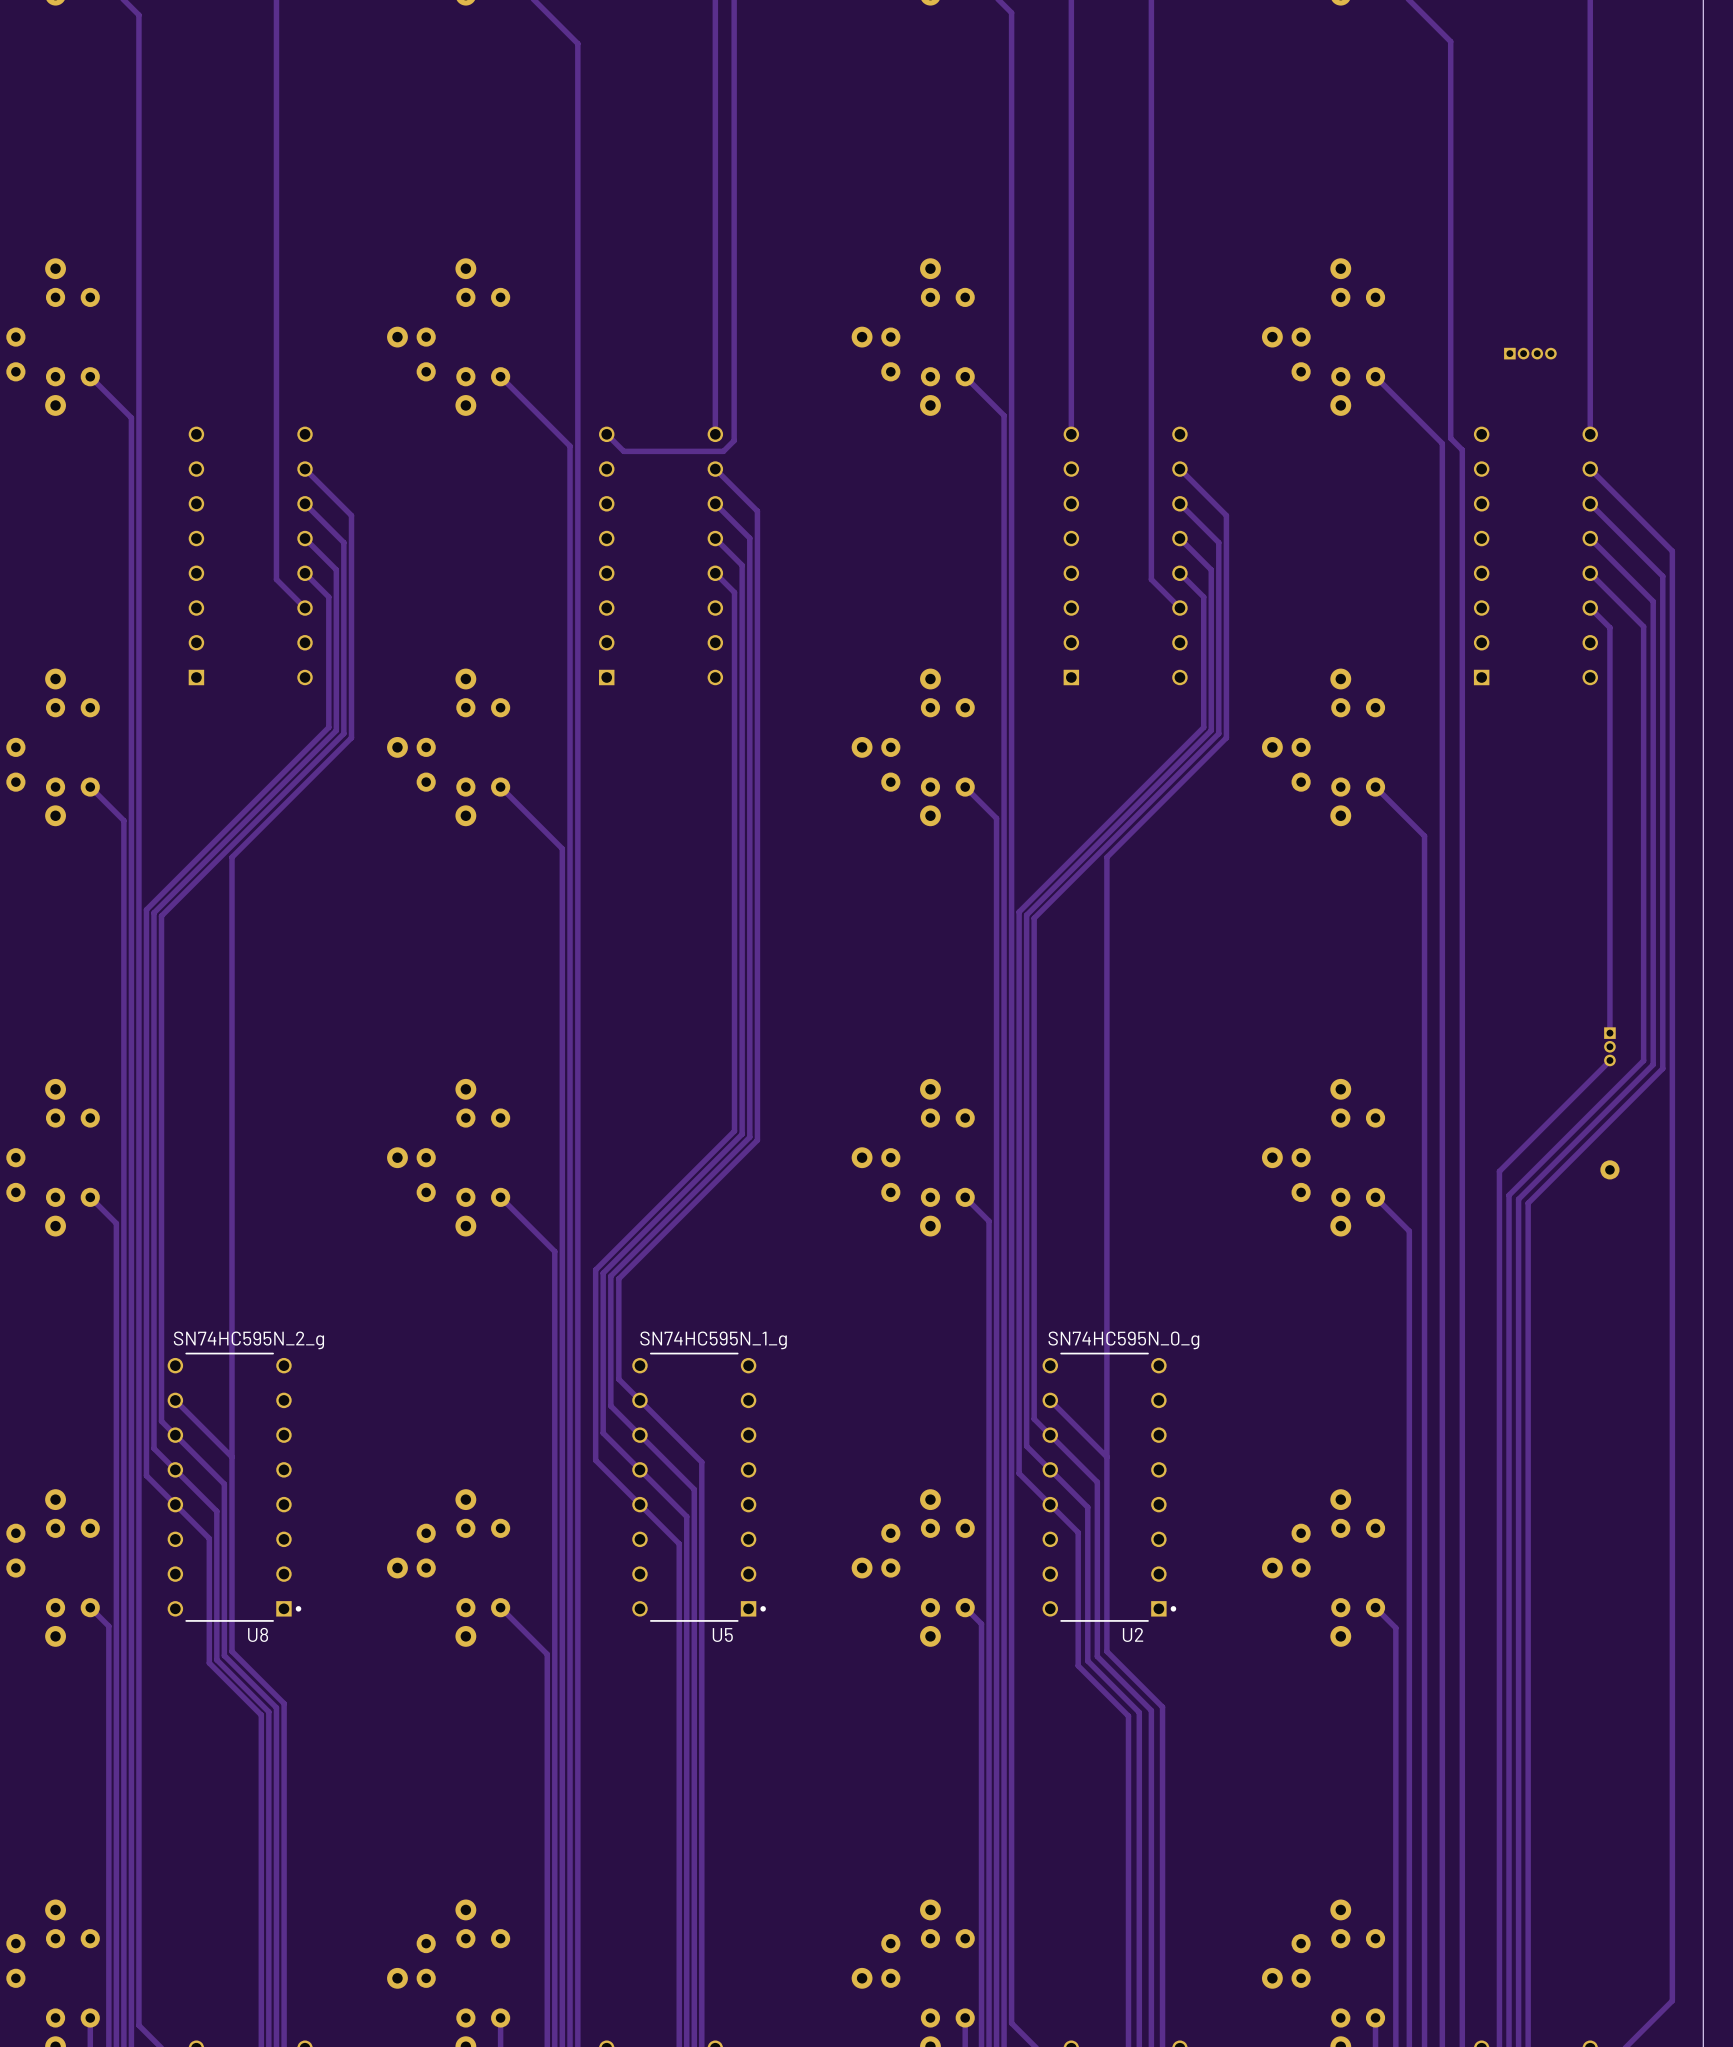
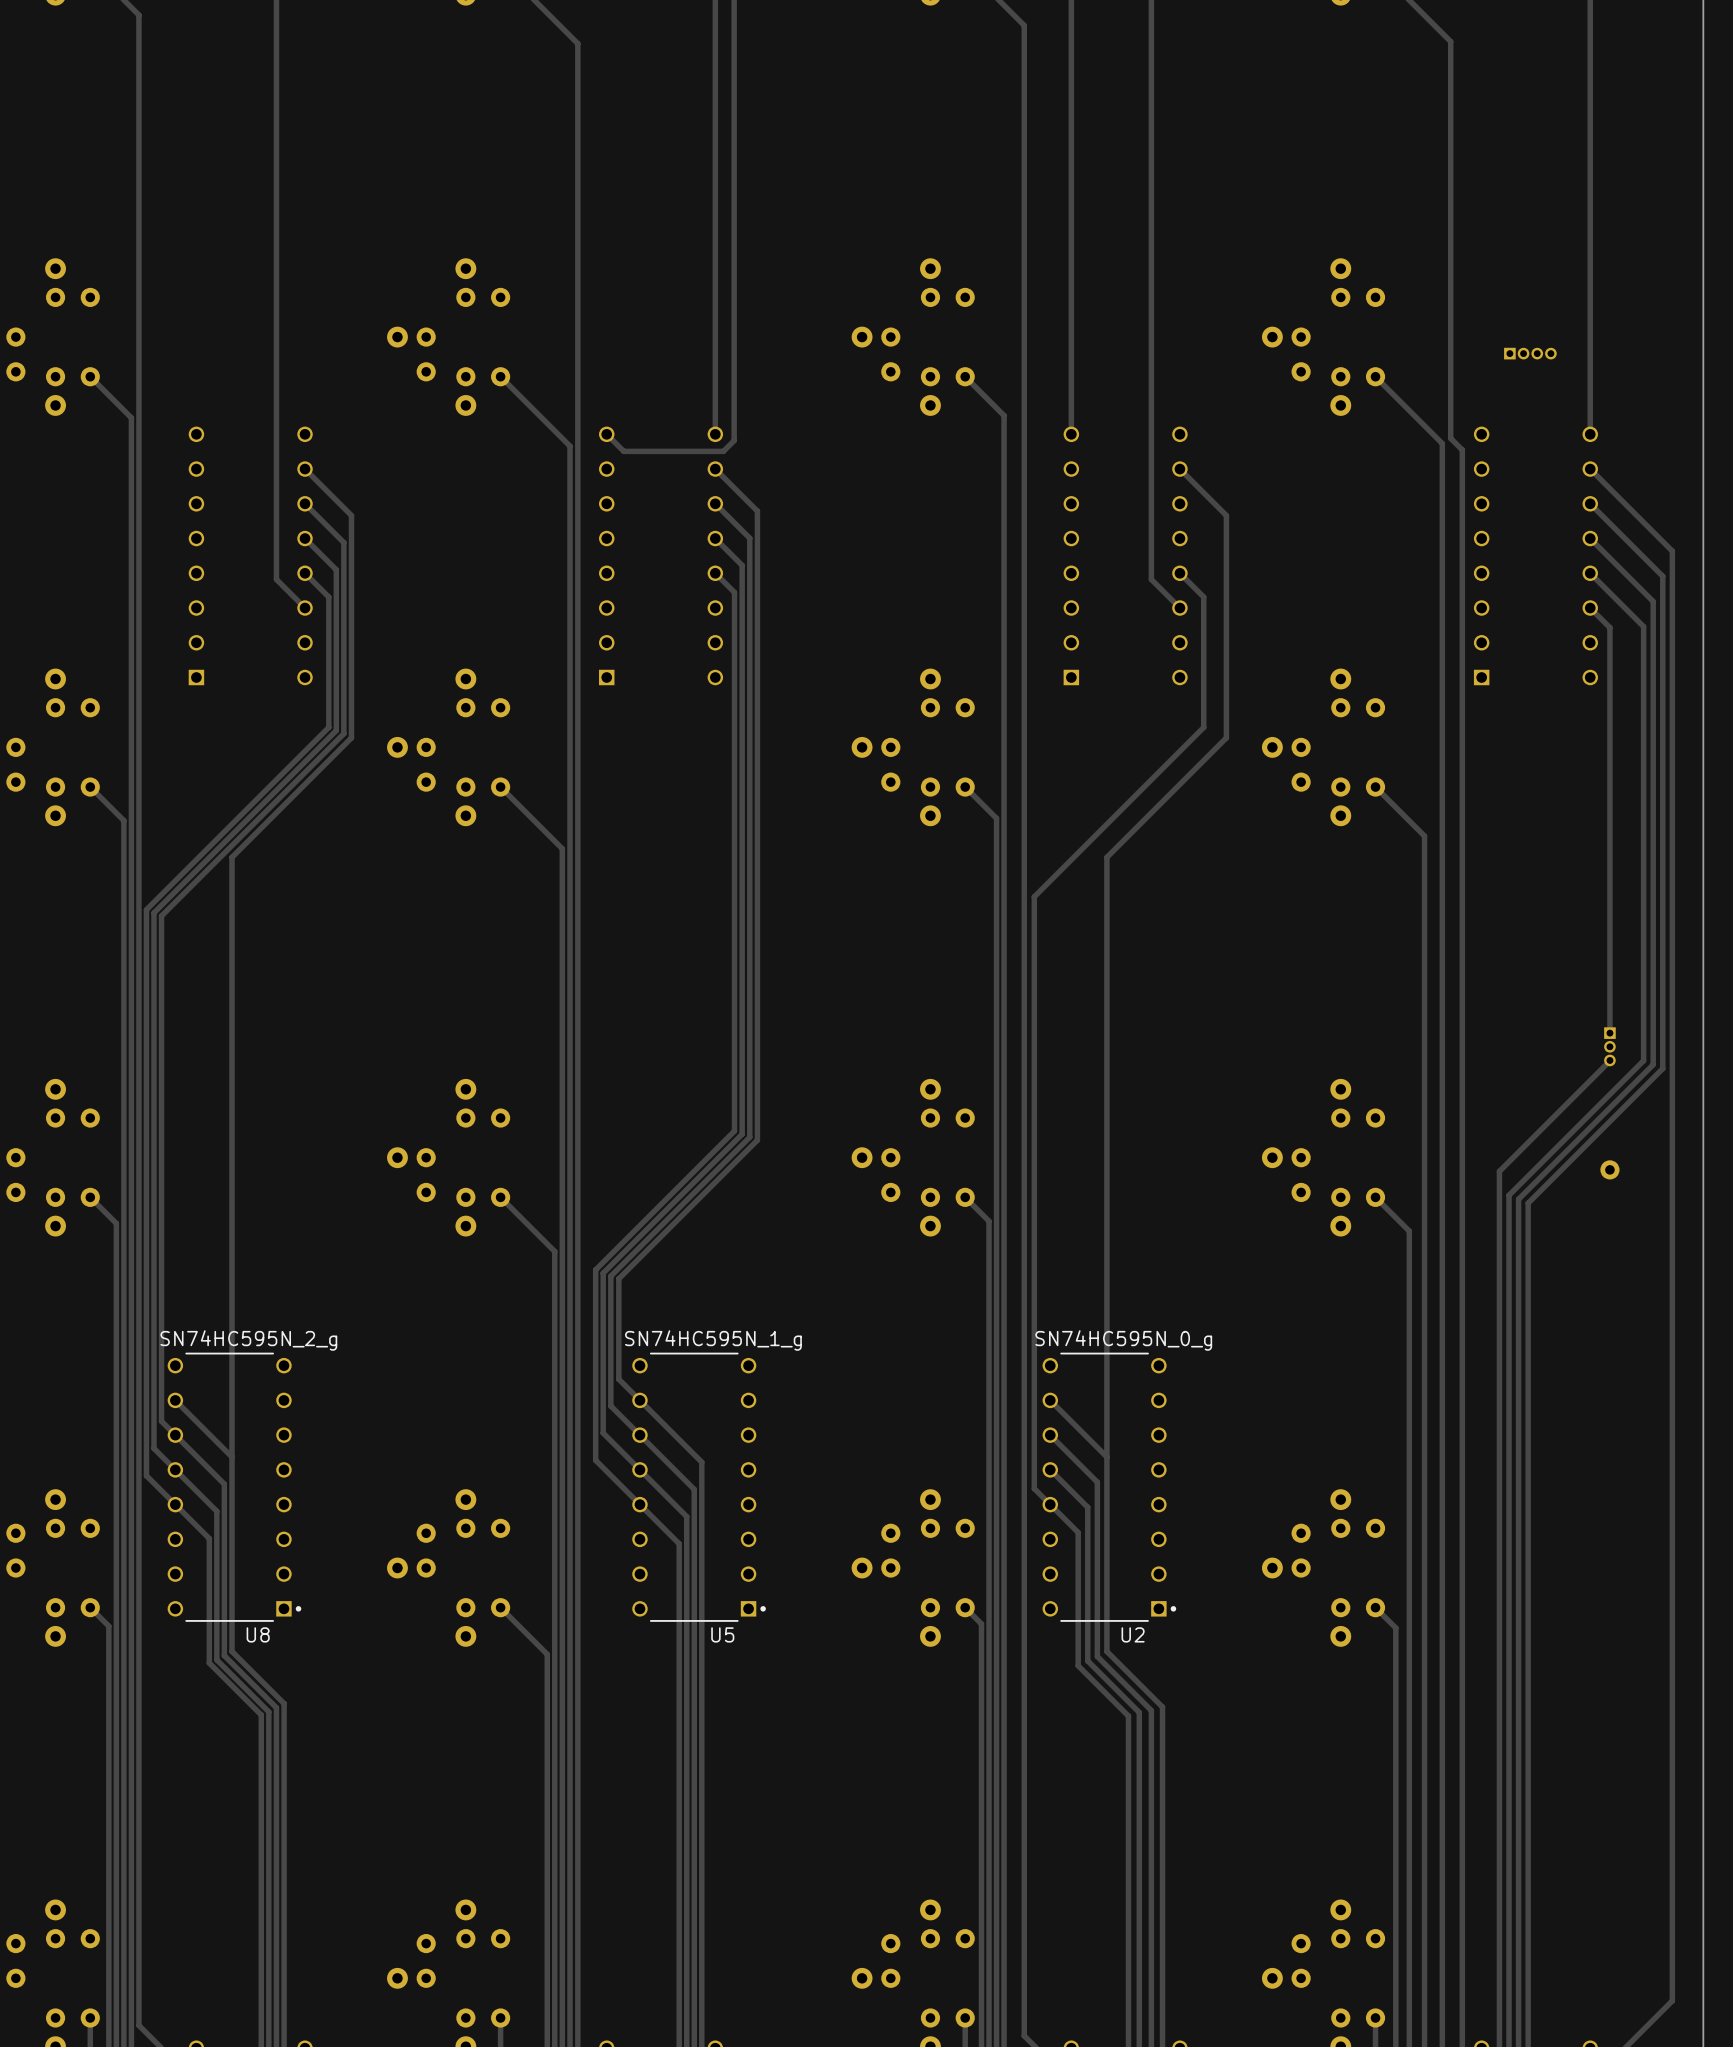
track: (1011, 12) (1011, 2023) (1024, 2035) -> (1011, 12) (1024, 25) (1024, 2035)
track: (1179, 503) (1218, 542) (1218, 733) (1034, 918) (1034, 1419) (1050, 1435) -> none
track: (1179, 538) (1211, 569) (1211, 730) (1026, 915) (1026, 1446) (1050, 1469) -> none
track: (1034, 896) (1019, 912) (1019, 1473) (1034, 1488) -> (1034, 896) (1034, 1488)

